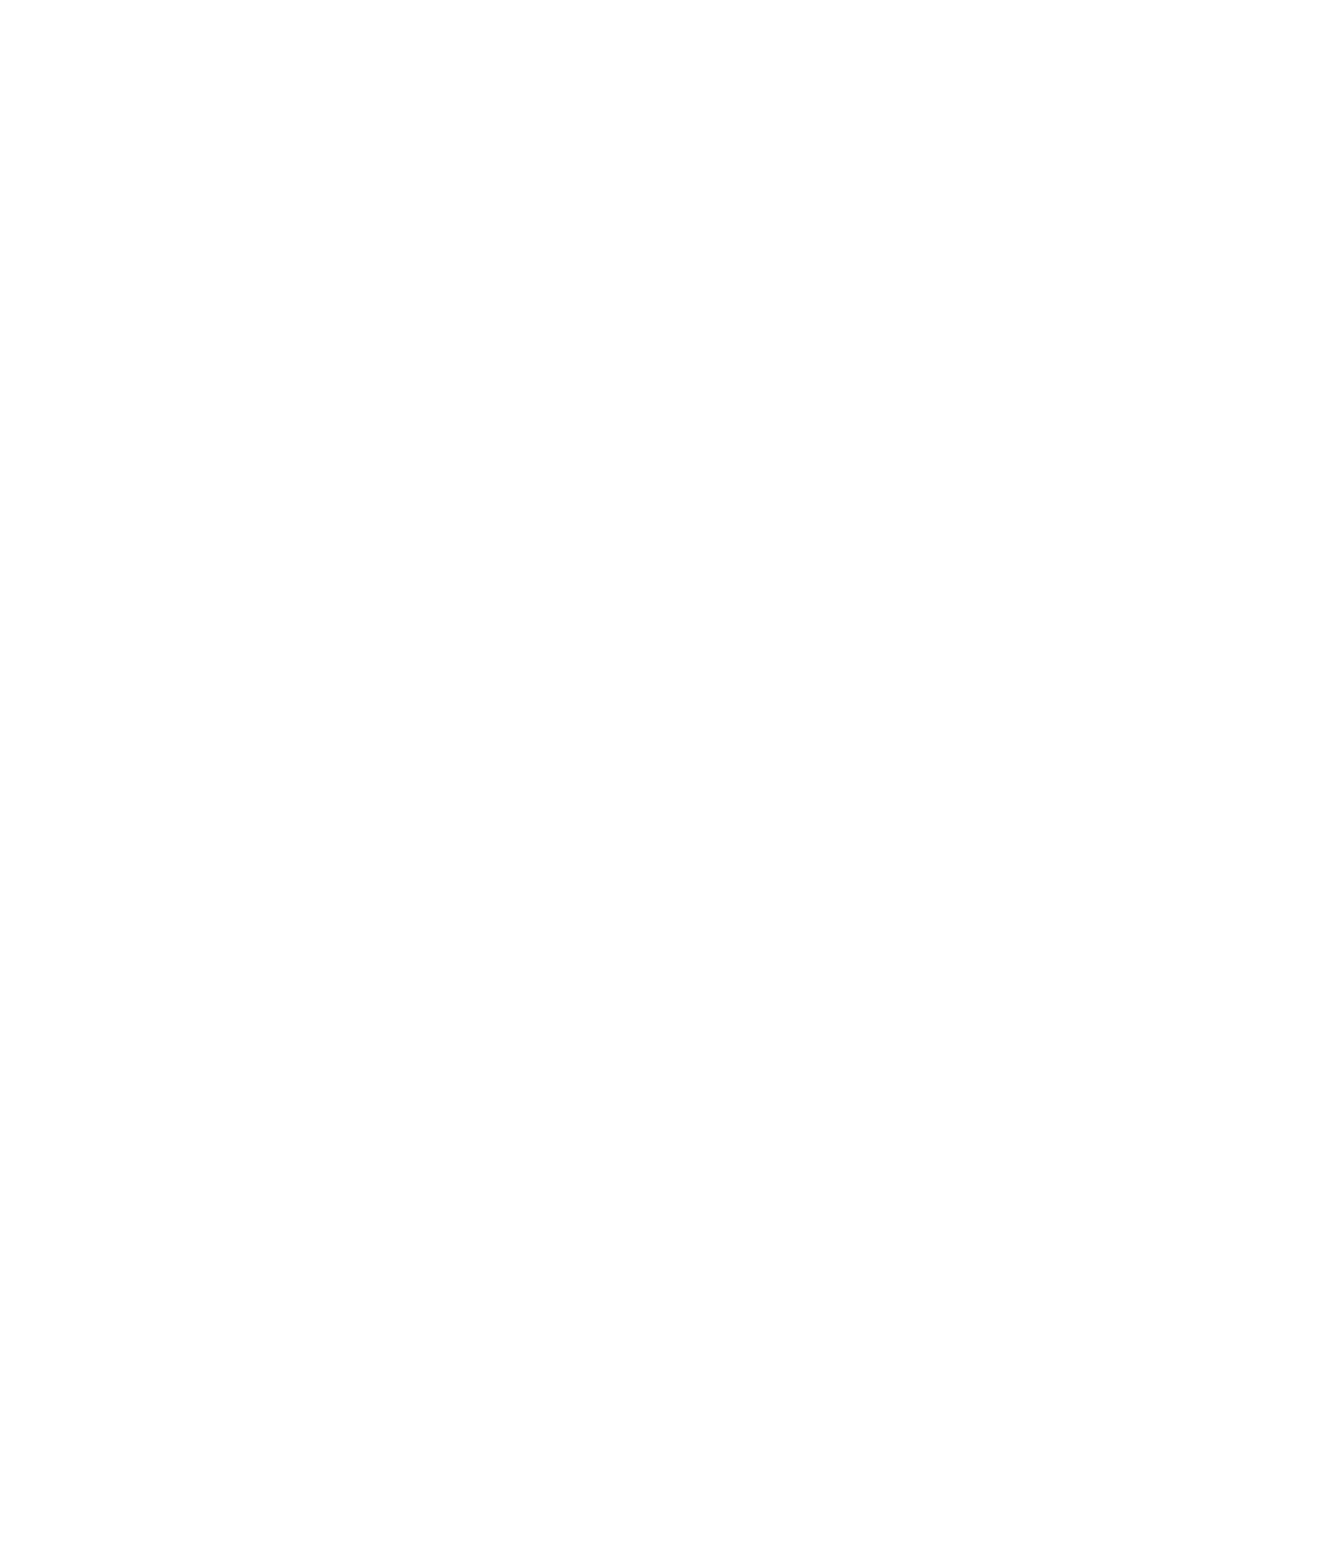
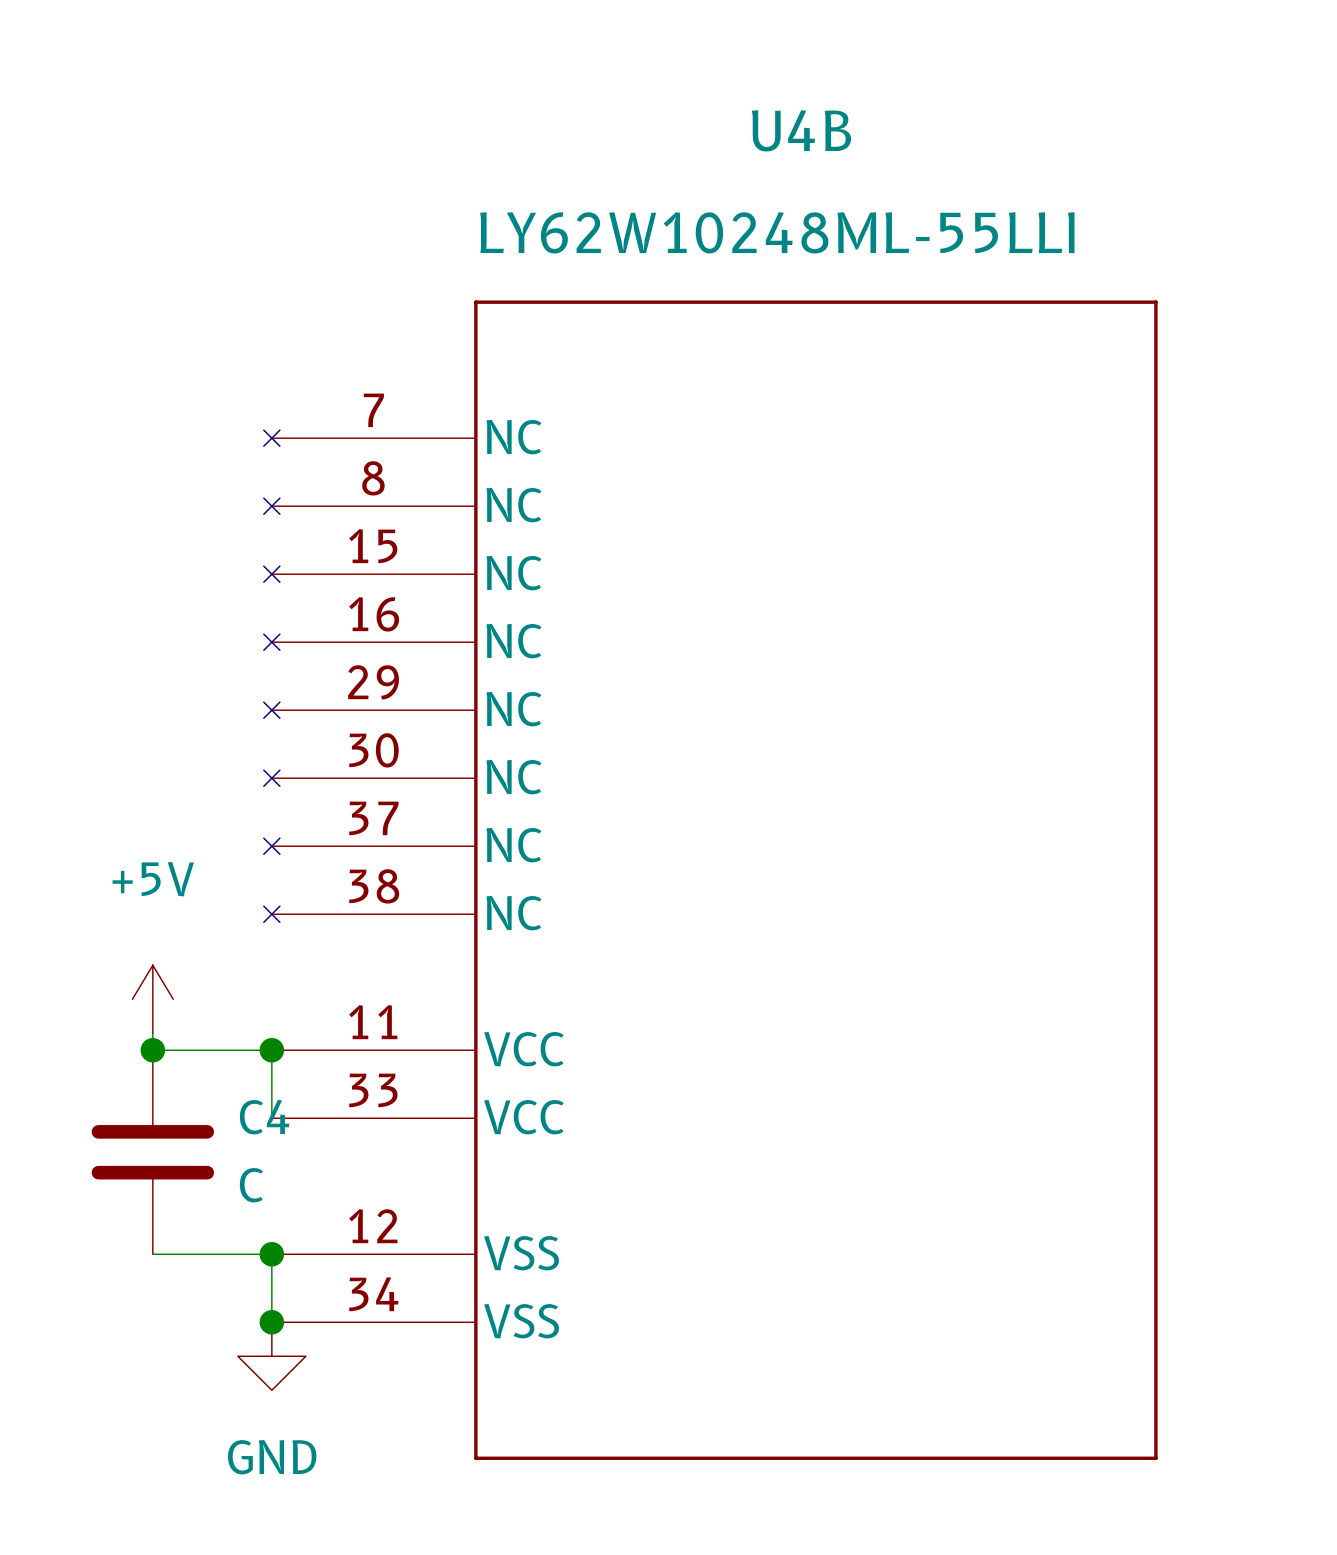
U4B: none -> LY62W10248ML-55LLI (710, 880)
power symbol: none -> +5V (152, 999)
wire: none -> (152, 1033) (152, 1050) (271, 1050) (271, 1118)
junction: none -> (152, 1050)
junction: none -> (271, 1050)
C4: none -> C (152, 1152)
wire: none -> (152, 1254) (271, 1254) (271, 1322)
junction: none -> (271, 1254)
junction: none -> (271, 1322)
power symbol: none -> GND (271, 1356)

